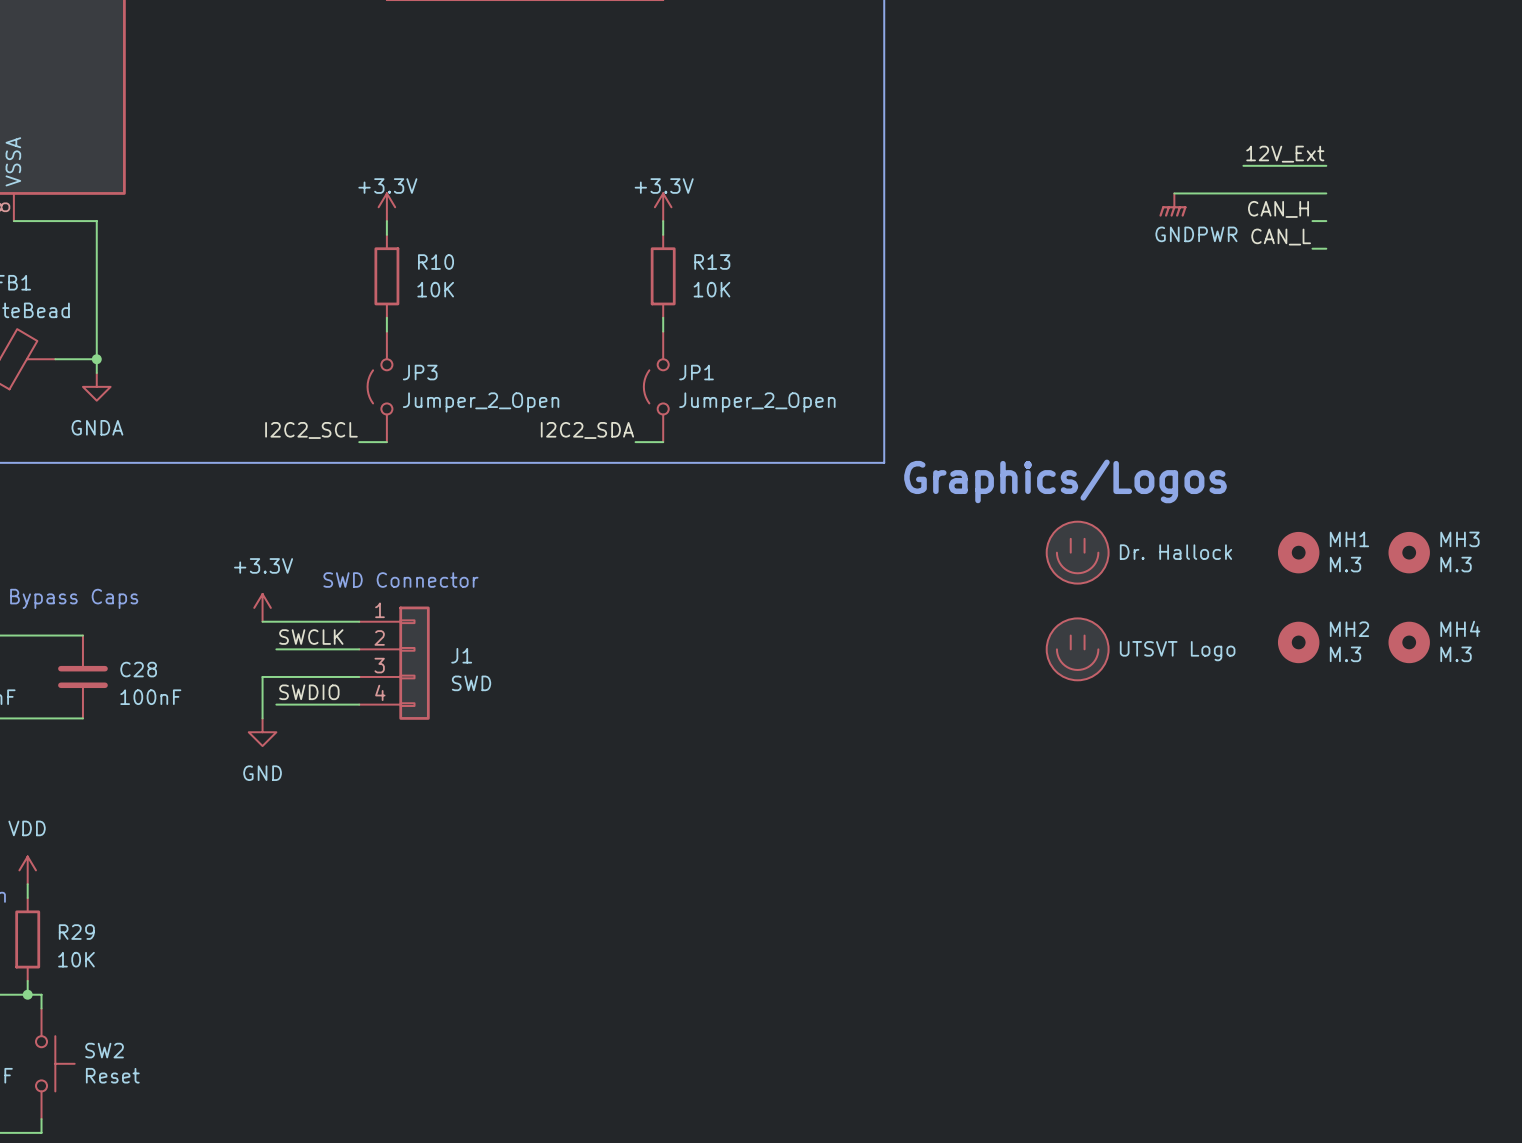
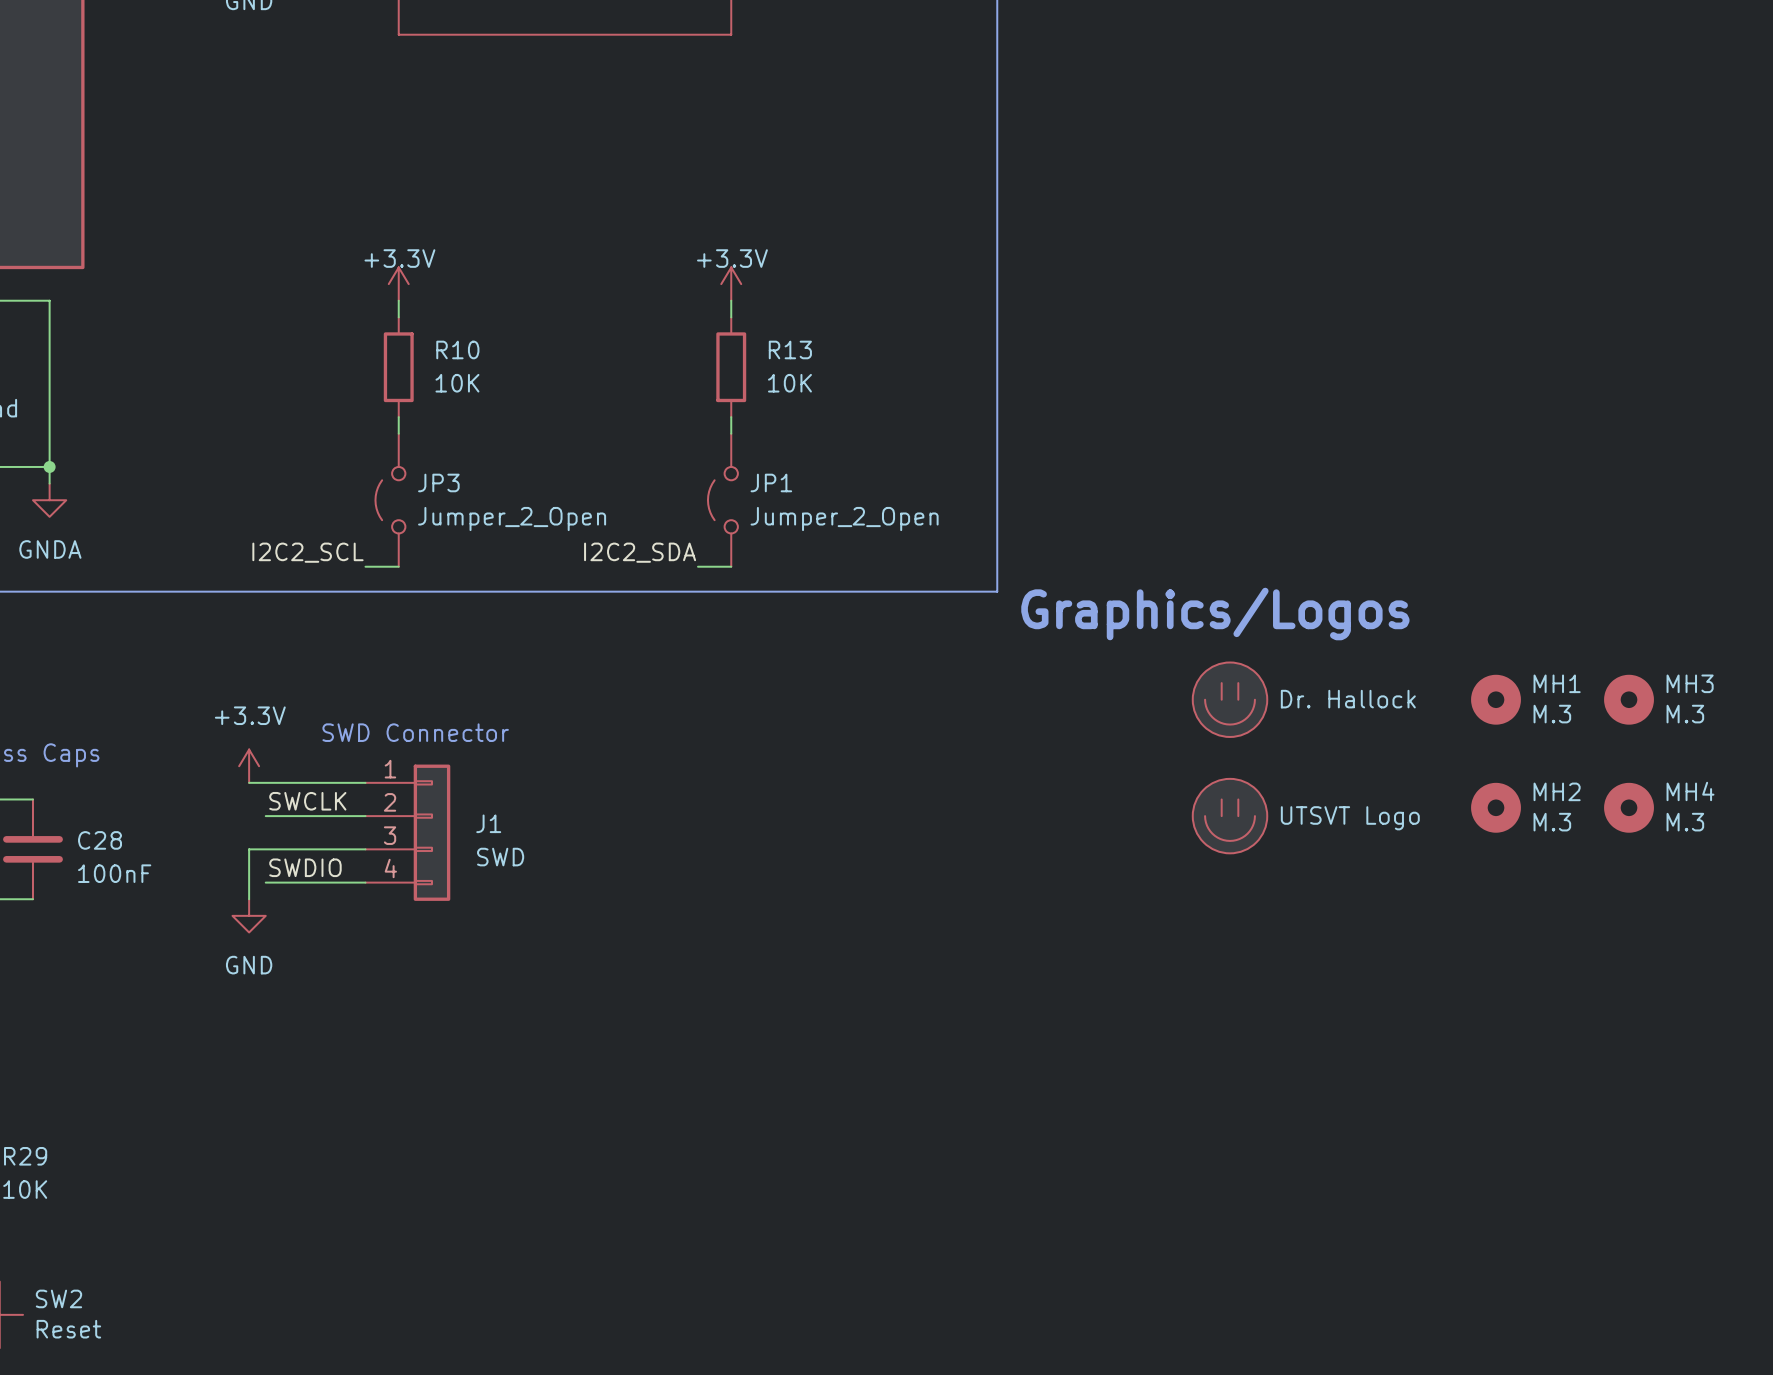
label: 12V_Ext (1285, 154) -> none
wire: (1243, 165) (1326, 165) -> none
wire: (1174, 193) (1326, 193) -> none
power symbol: GNDPWR (1172, 205) -> none
label: CAN_H (1278, 209) -> none
wire: (1312, 221) (1326, 221) -> none
label: CAN_L (1281, 237) -> none
wire: (1312, 248) (1326, 248) -> none

